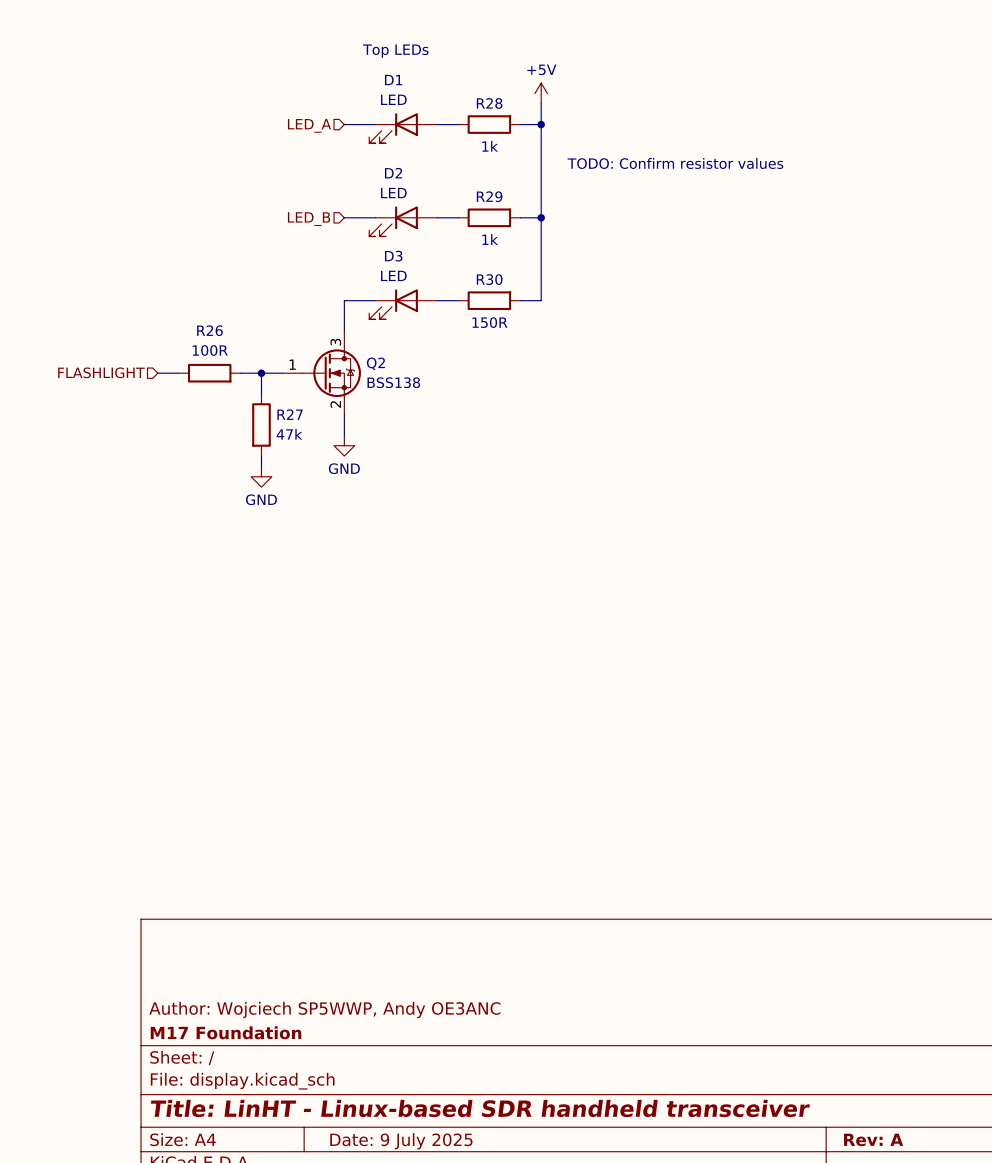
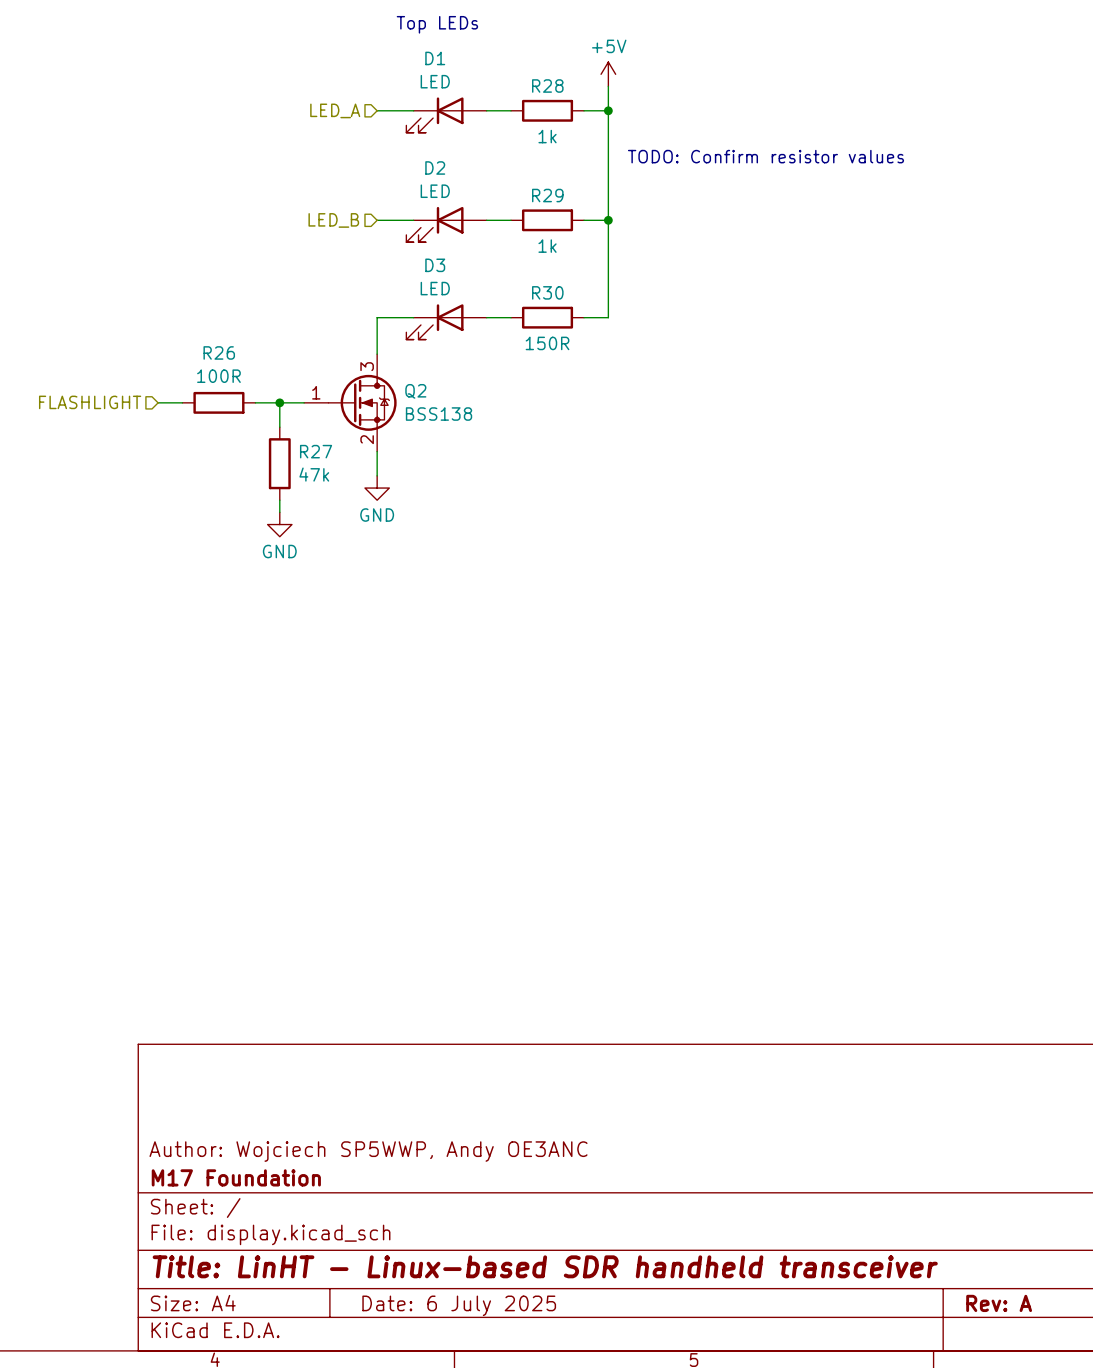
title block: Date: 9 July 2025 (401, 1141) -> Date: 6 July 2025 (459, 1305)

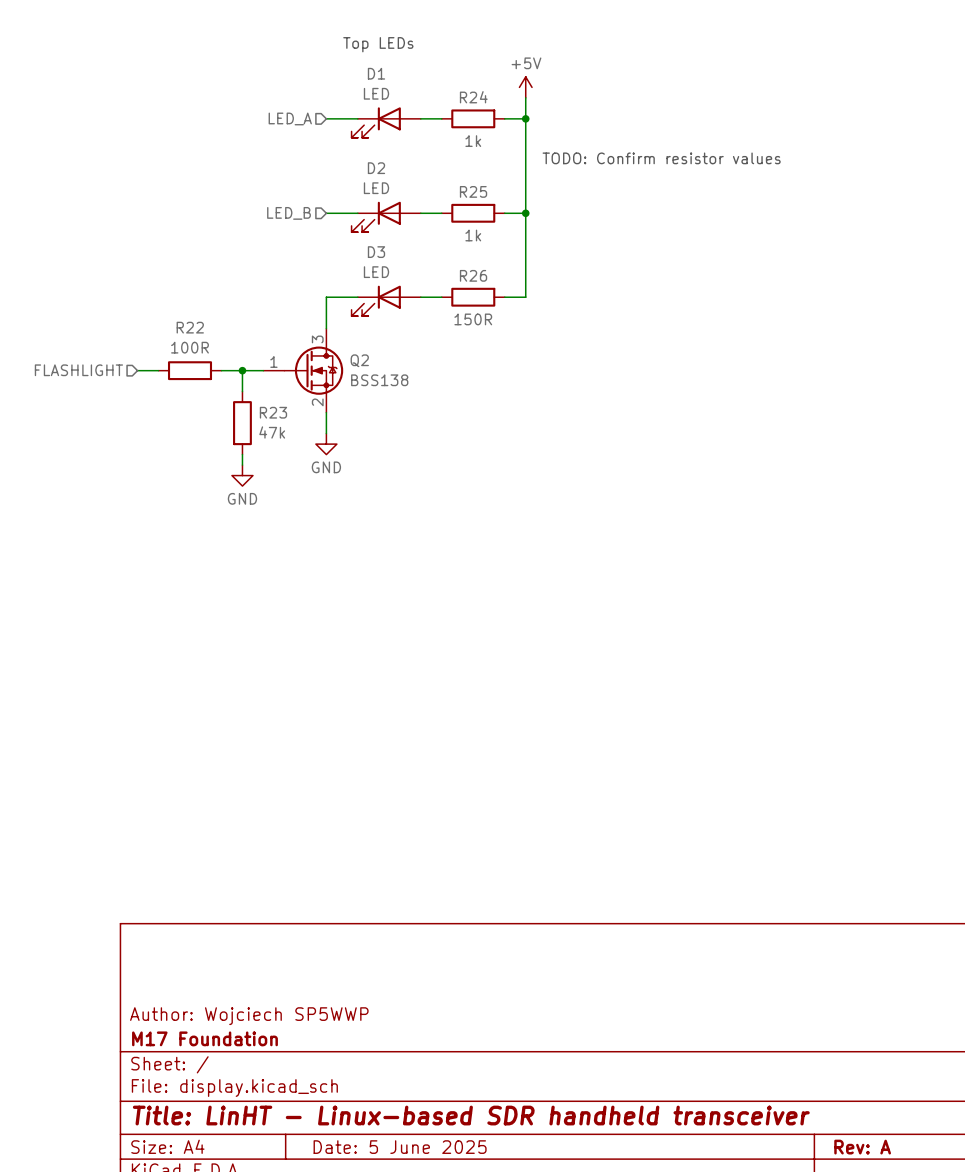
R28 name: R28 (547, 86) -> R24 (473, 97)
R29 name: R29 (547, 195) -> R25 (473, 191)
R30 name: R30 (547, 292) -> R26 (473, 275)
R26 name: R26 (219, 352) -> R22 (190, 327)
R27 name: R27 (316, 451) -> R23 (273, 412)
title block: Author: Wojciech SP5WWP, Andy OE3ANC (368, 1151) -> Author: Wojciech SP5WWP (249, 1016)
title block: Date: 6 July 2025 (459, 1305) -> Date: 5 June 2025 (400, 1147)

